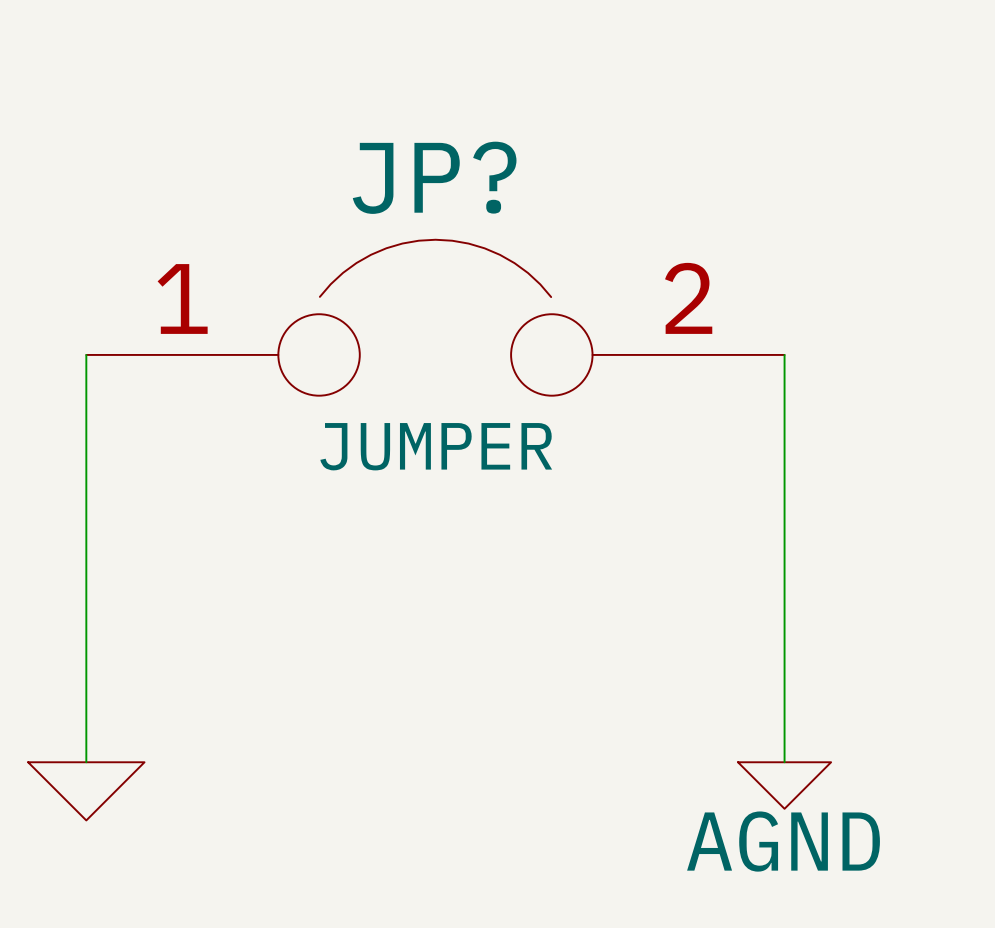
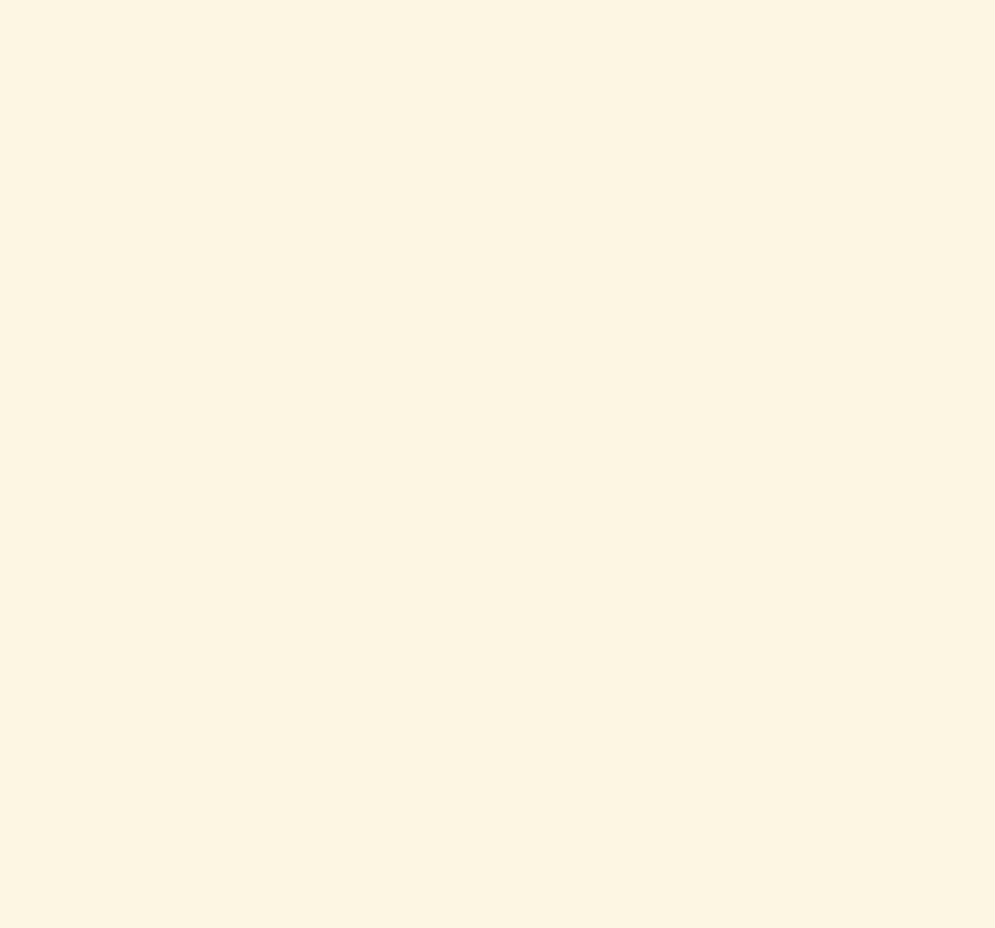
JP?: JUMPER (435, 317) -> none
wire: (86, 354) (86, 762) -> none
wire: (784, 354) (784, 762) -> none
power symbol: AGND (784, 785) -> none
power symbol: (86, 791) -> none

